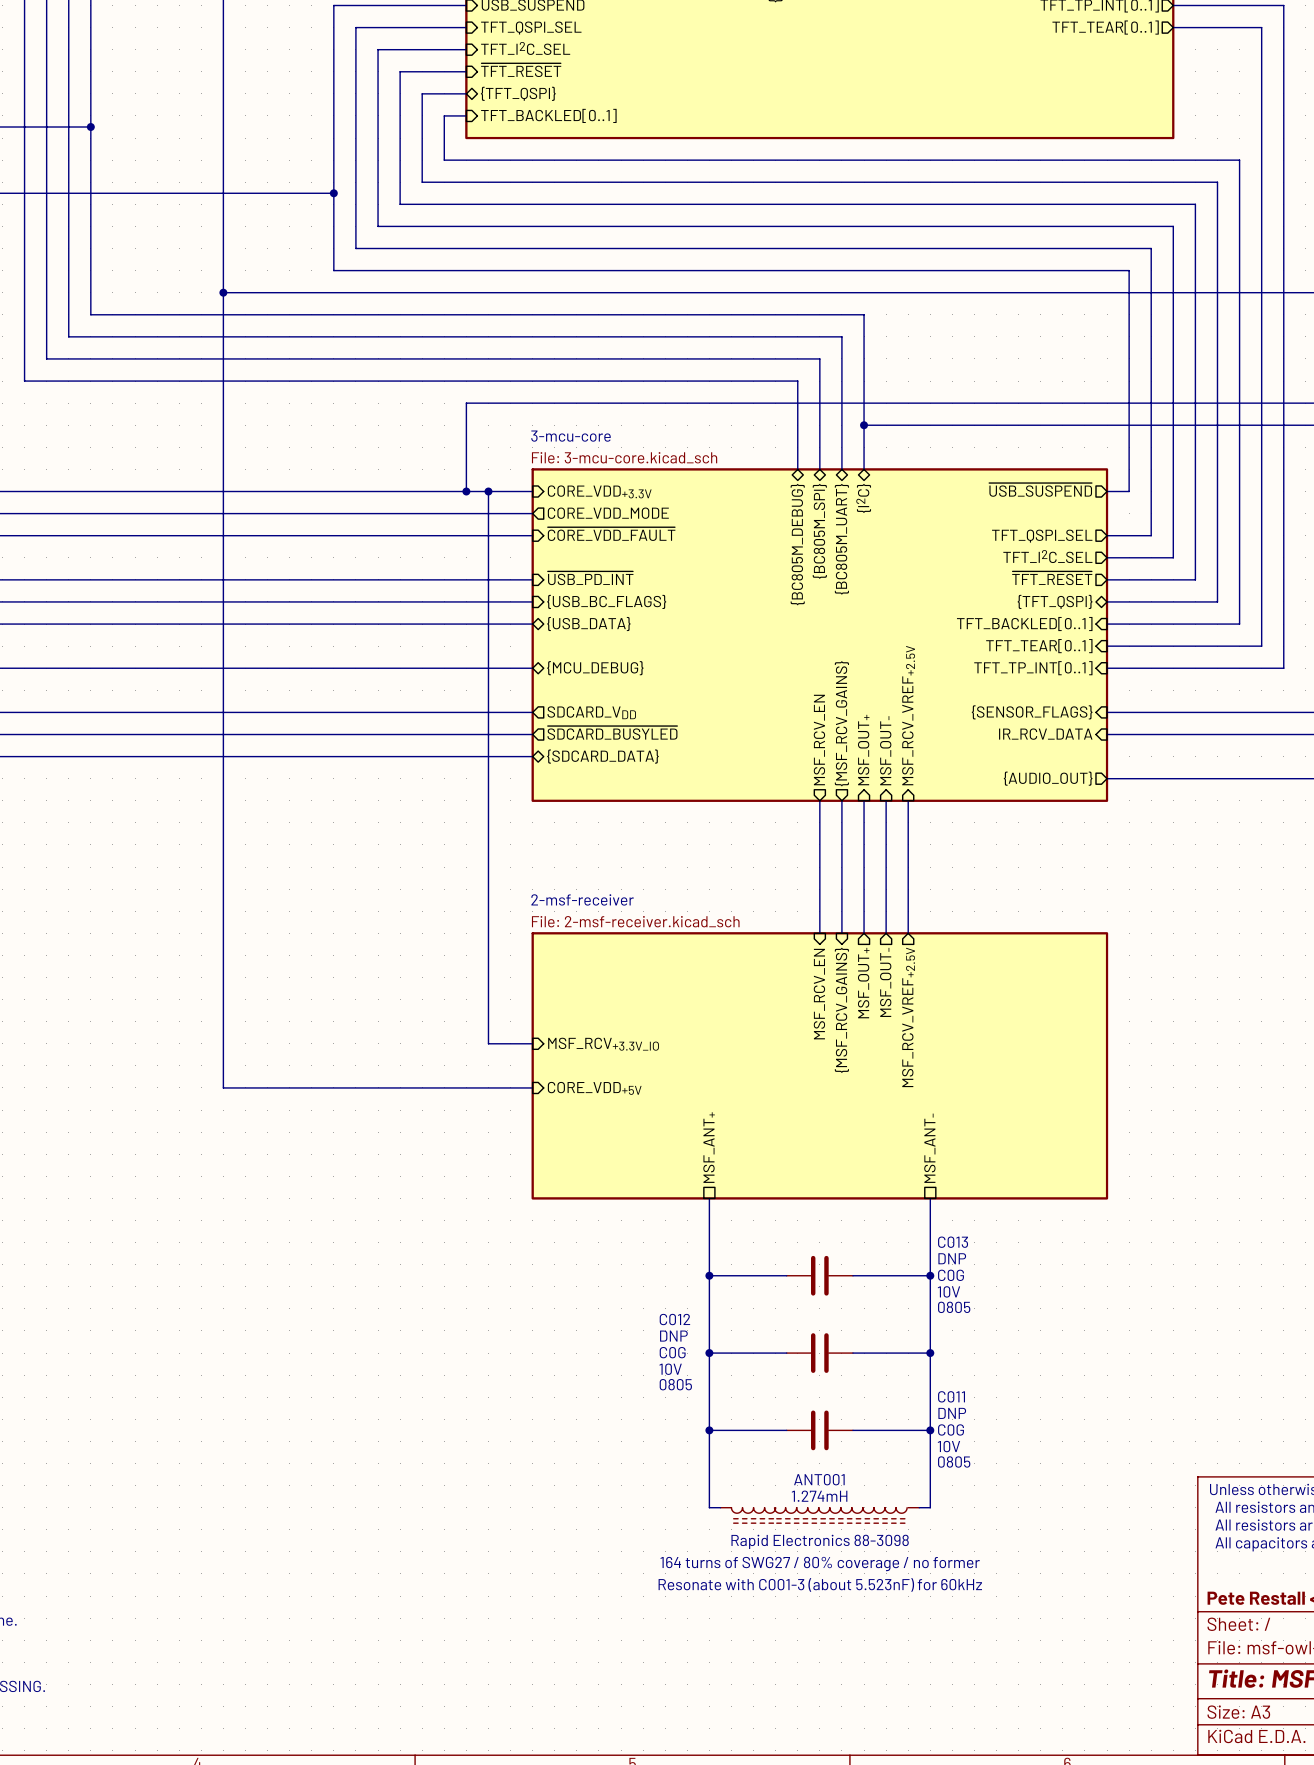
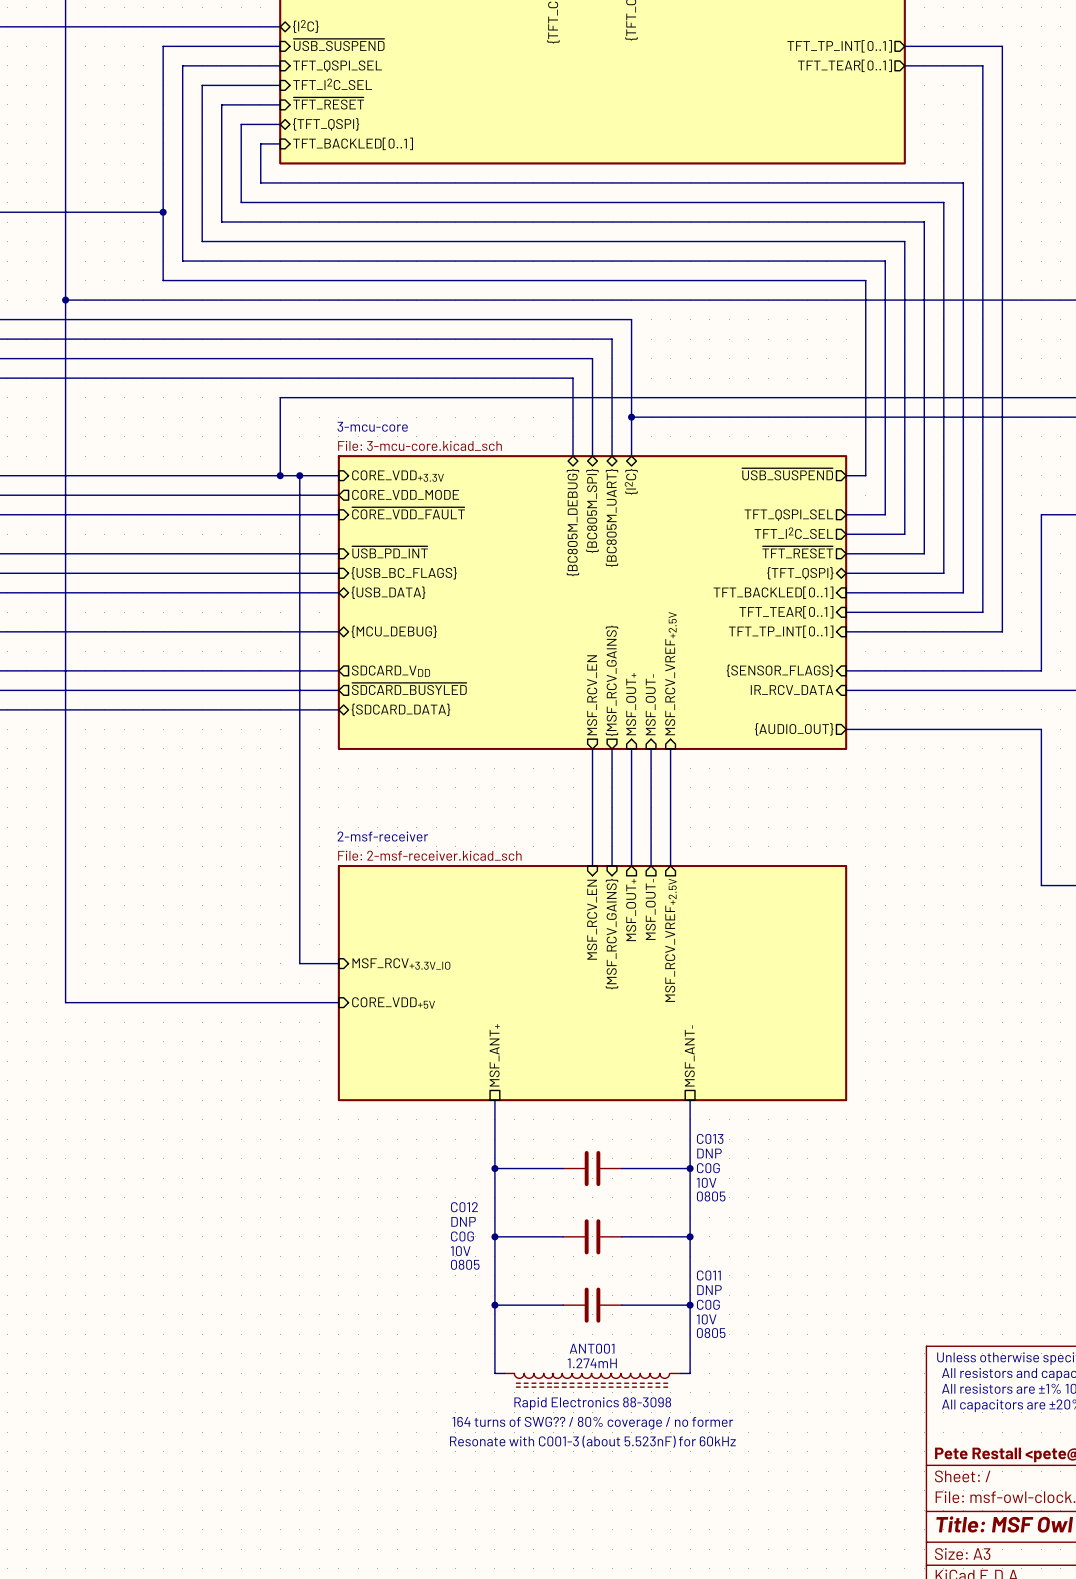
ANT001 text: 164 turns of SWG27 / 80% coverage / no former (820, 1564) -> 164 turns of SWG?? / 80% coverage / no former (592, 1423)

